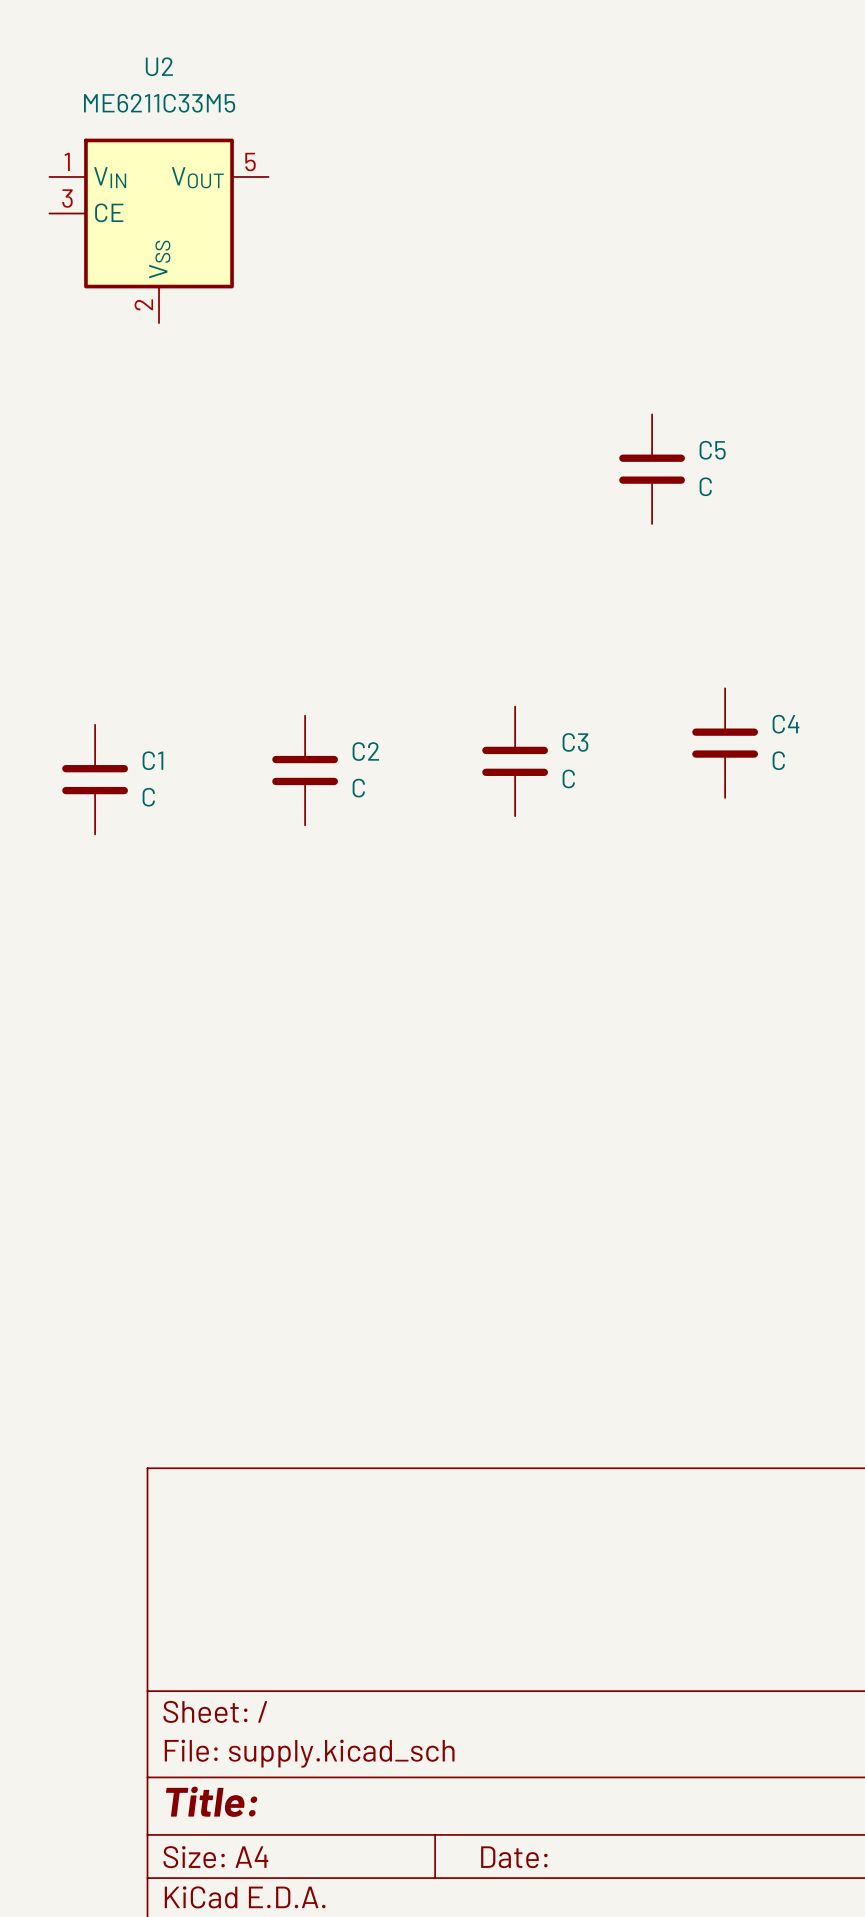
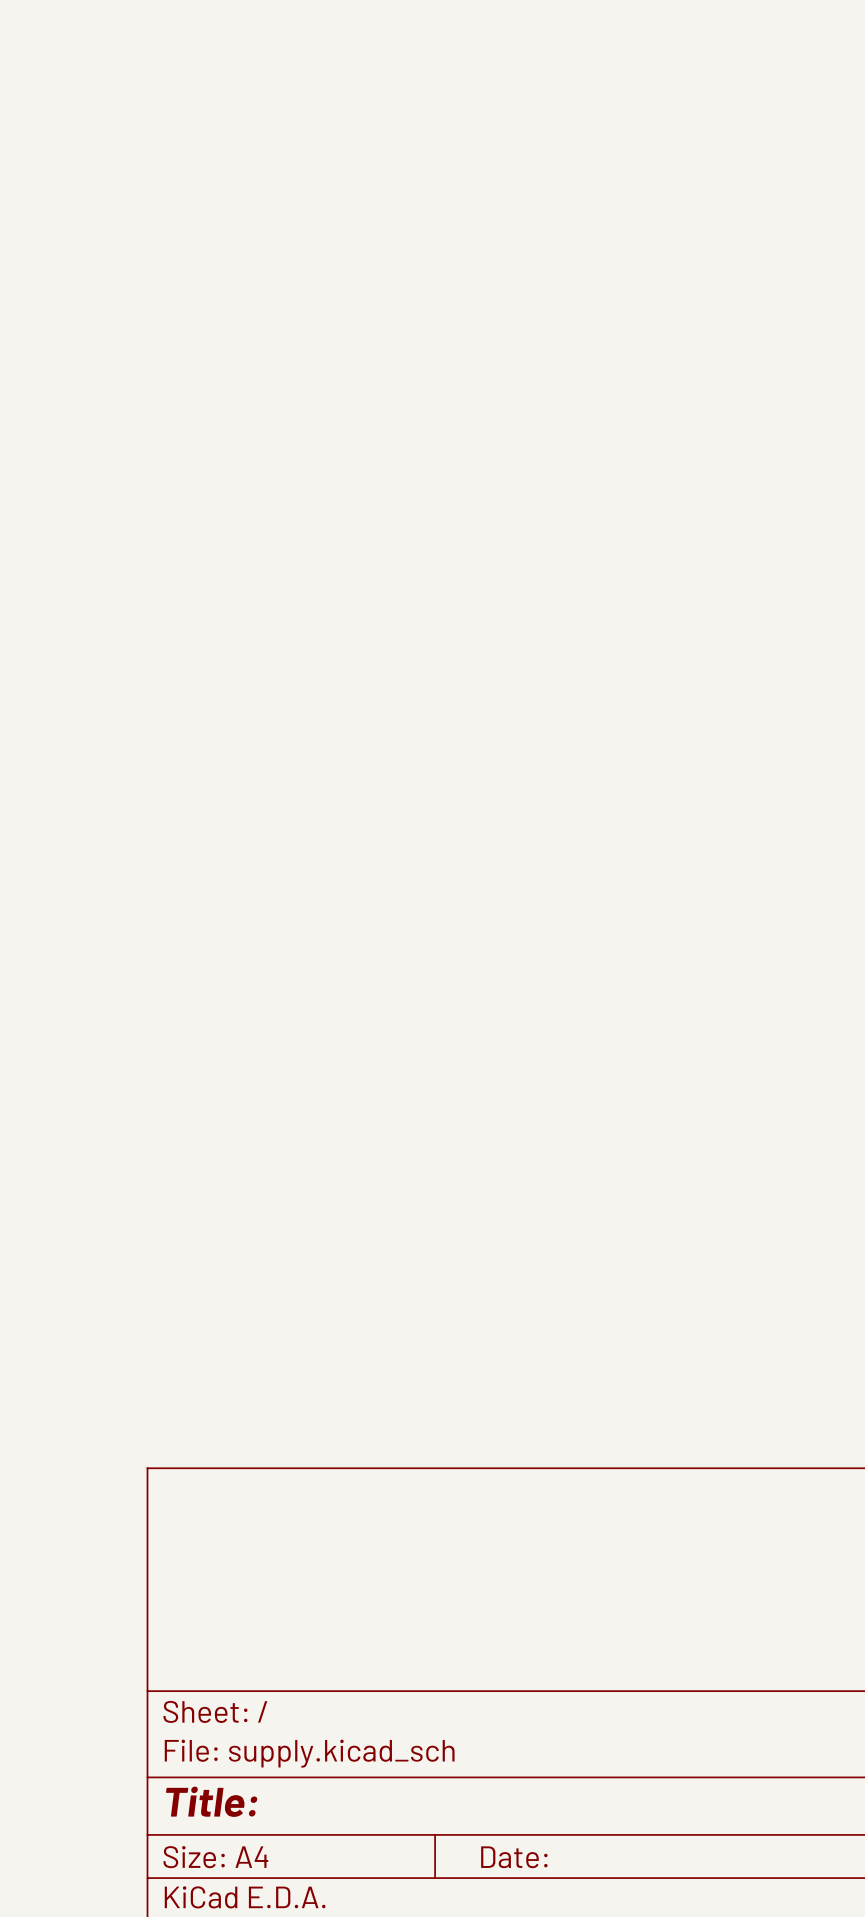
U2: ME6211C33M5 (159, 230) -> none
C5: C (652, 469) -> none
C4: C (725, 743) -> none
C3: C (515, 761) -> none
C2: C (305, 770) -> none
C1: C (95, 779) -> none

